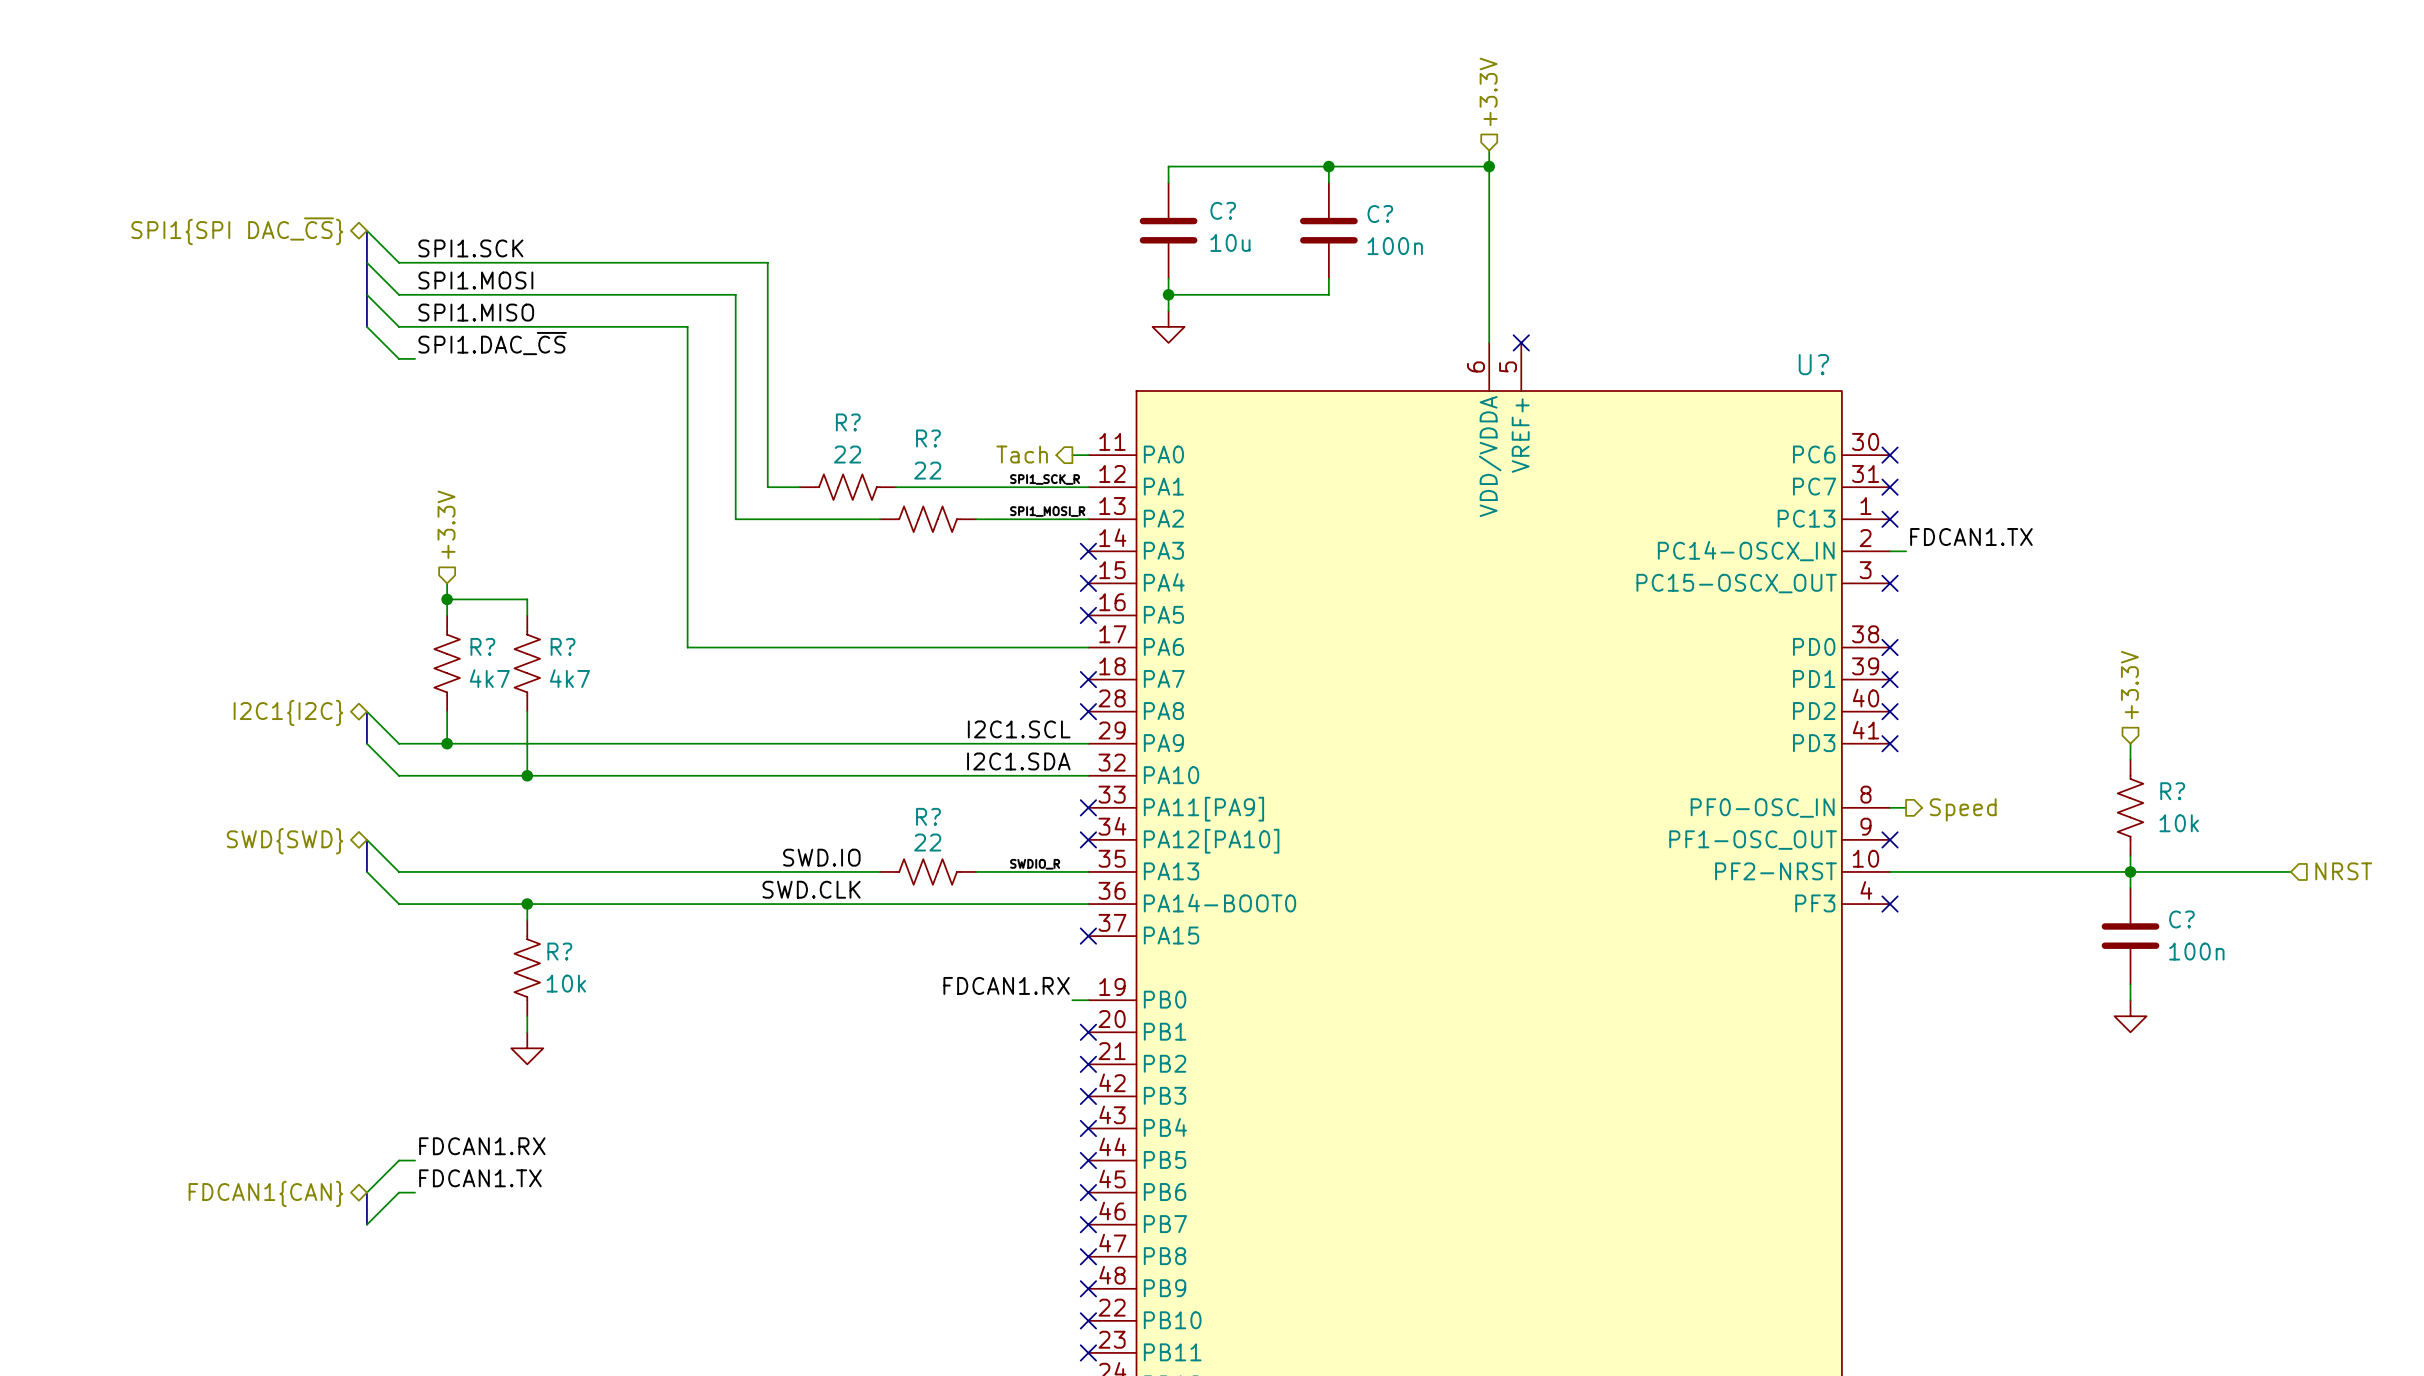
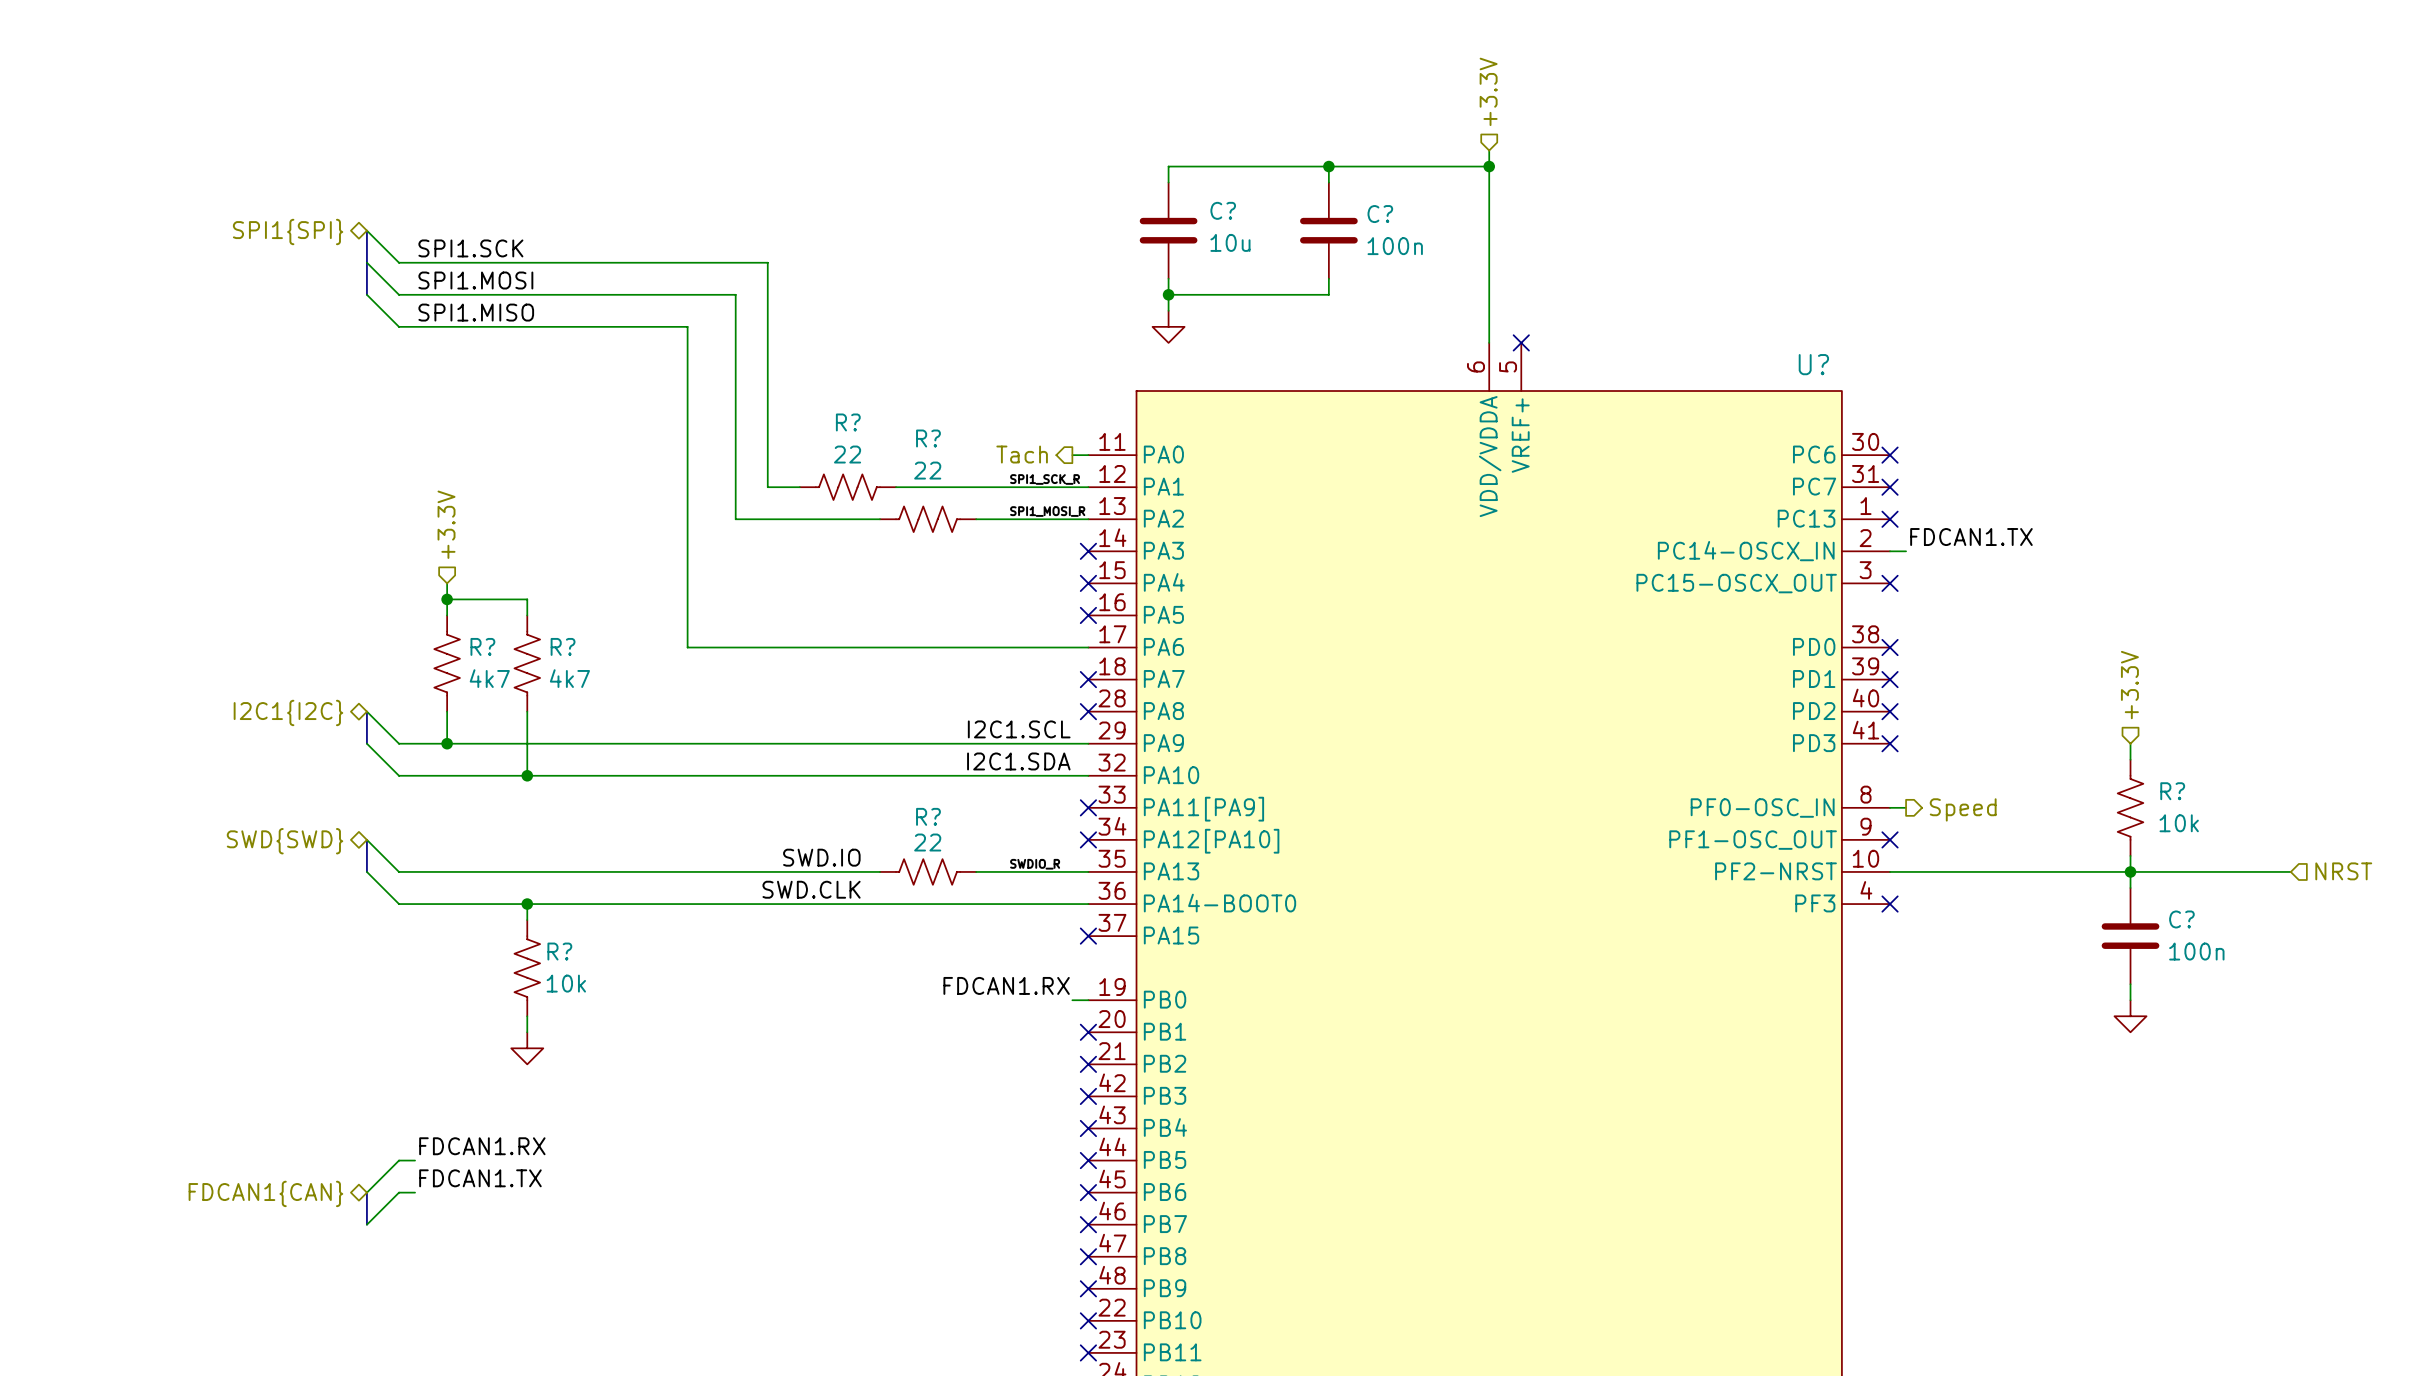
hierarchical label: SPI1{SPI DAC_~{CS}} (237, 231) -> SPI1{SPI} (288, 231)
bus: (366, 294) (366, 326) -> none
wire: (366, 326) (399, 358) (415, 358) -> none
label: SPI1.DAC_~{CS} (492, 343) -> none

